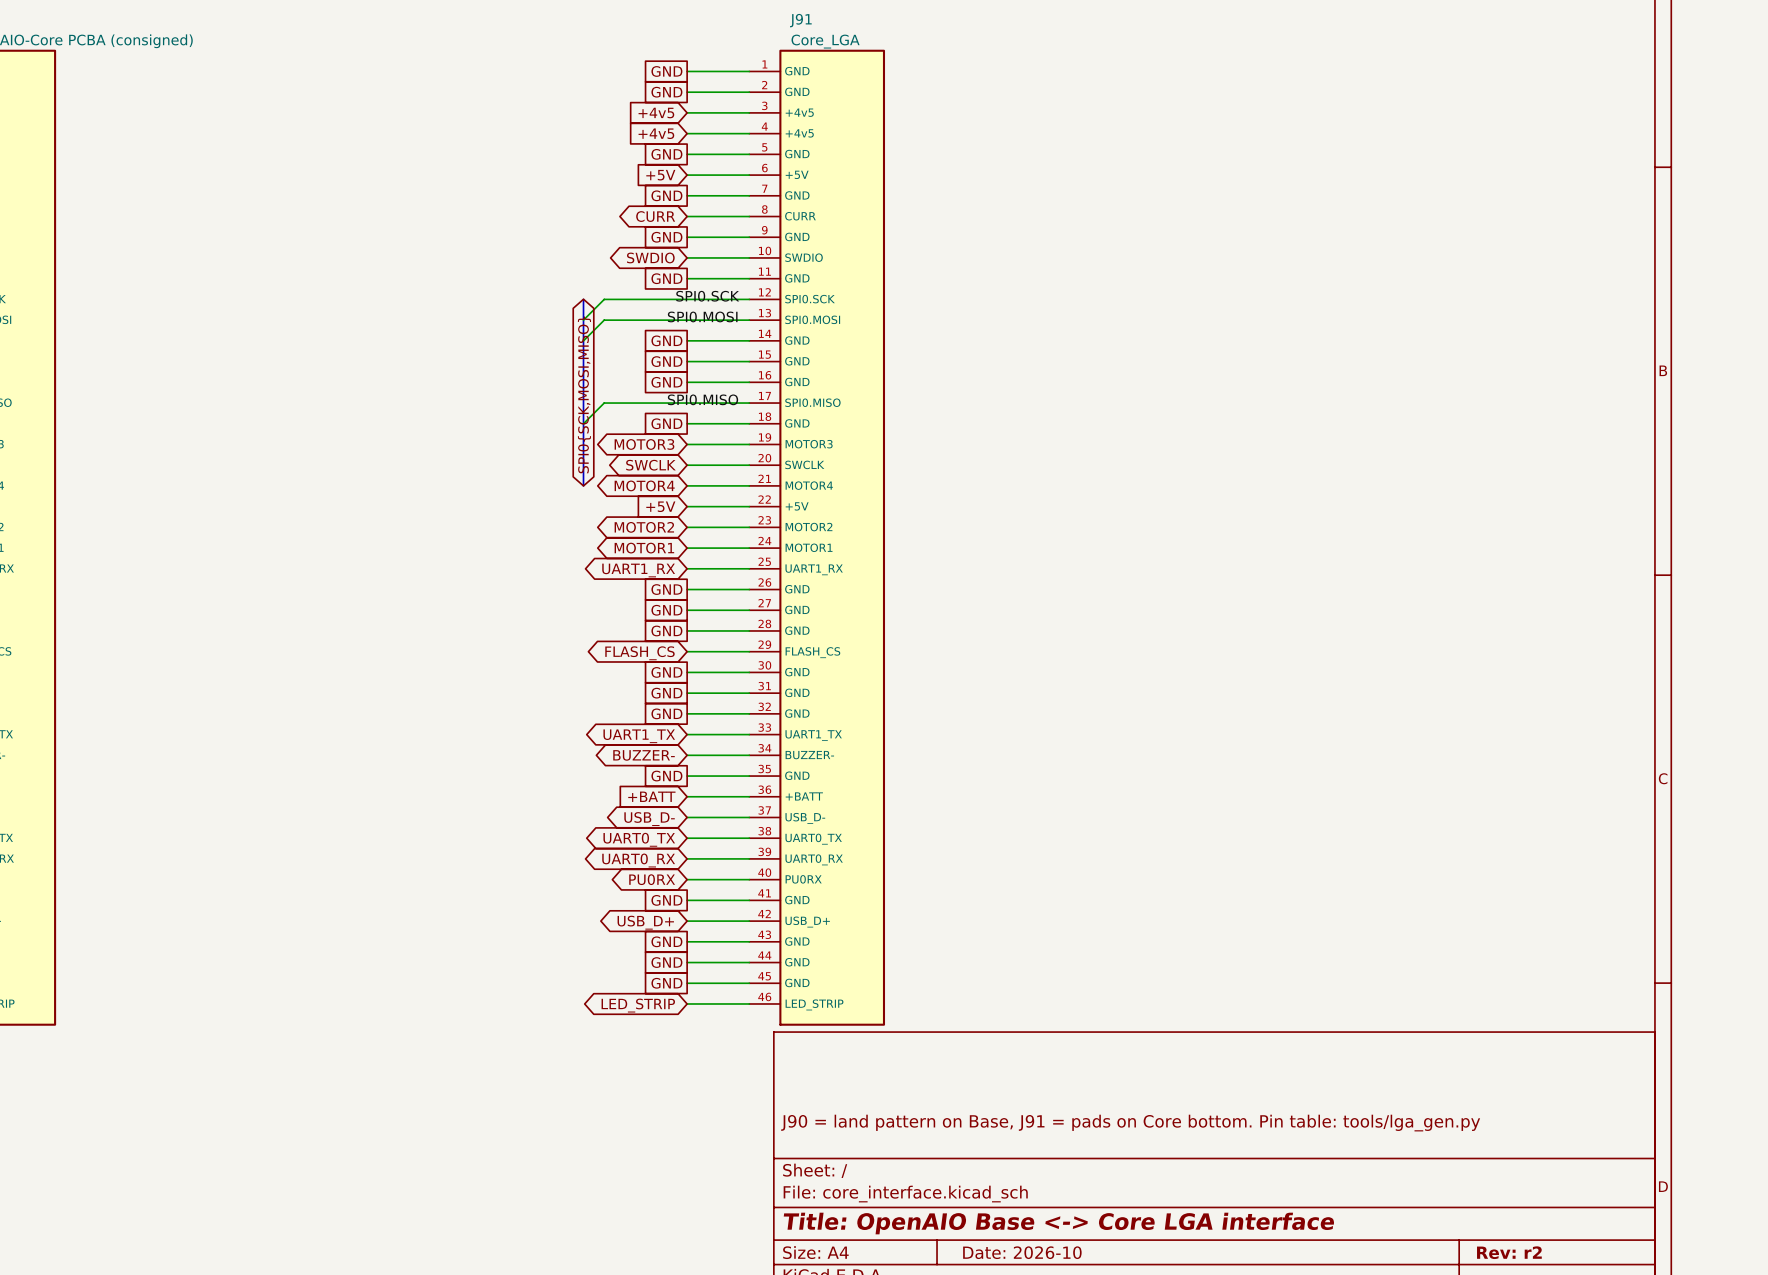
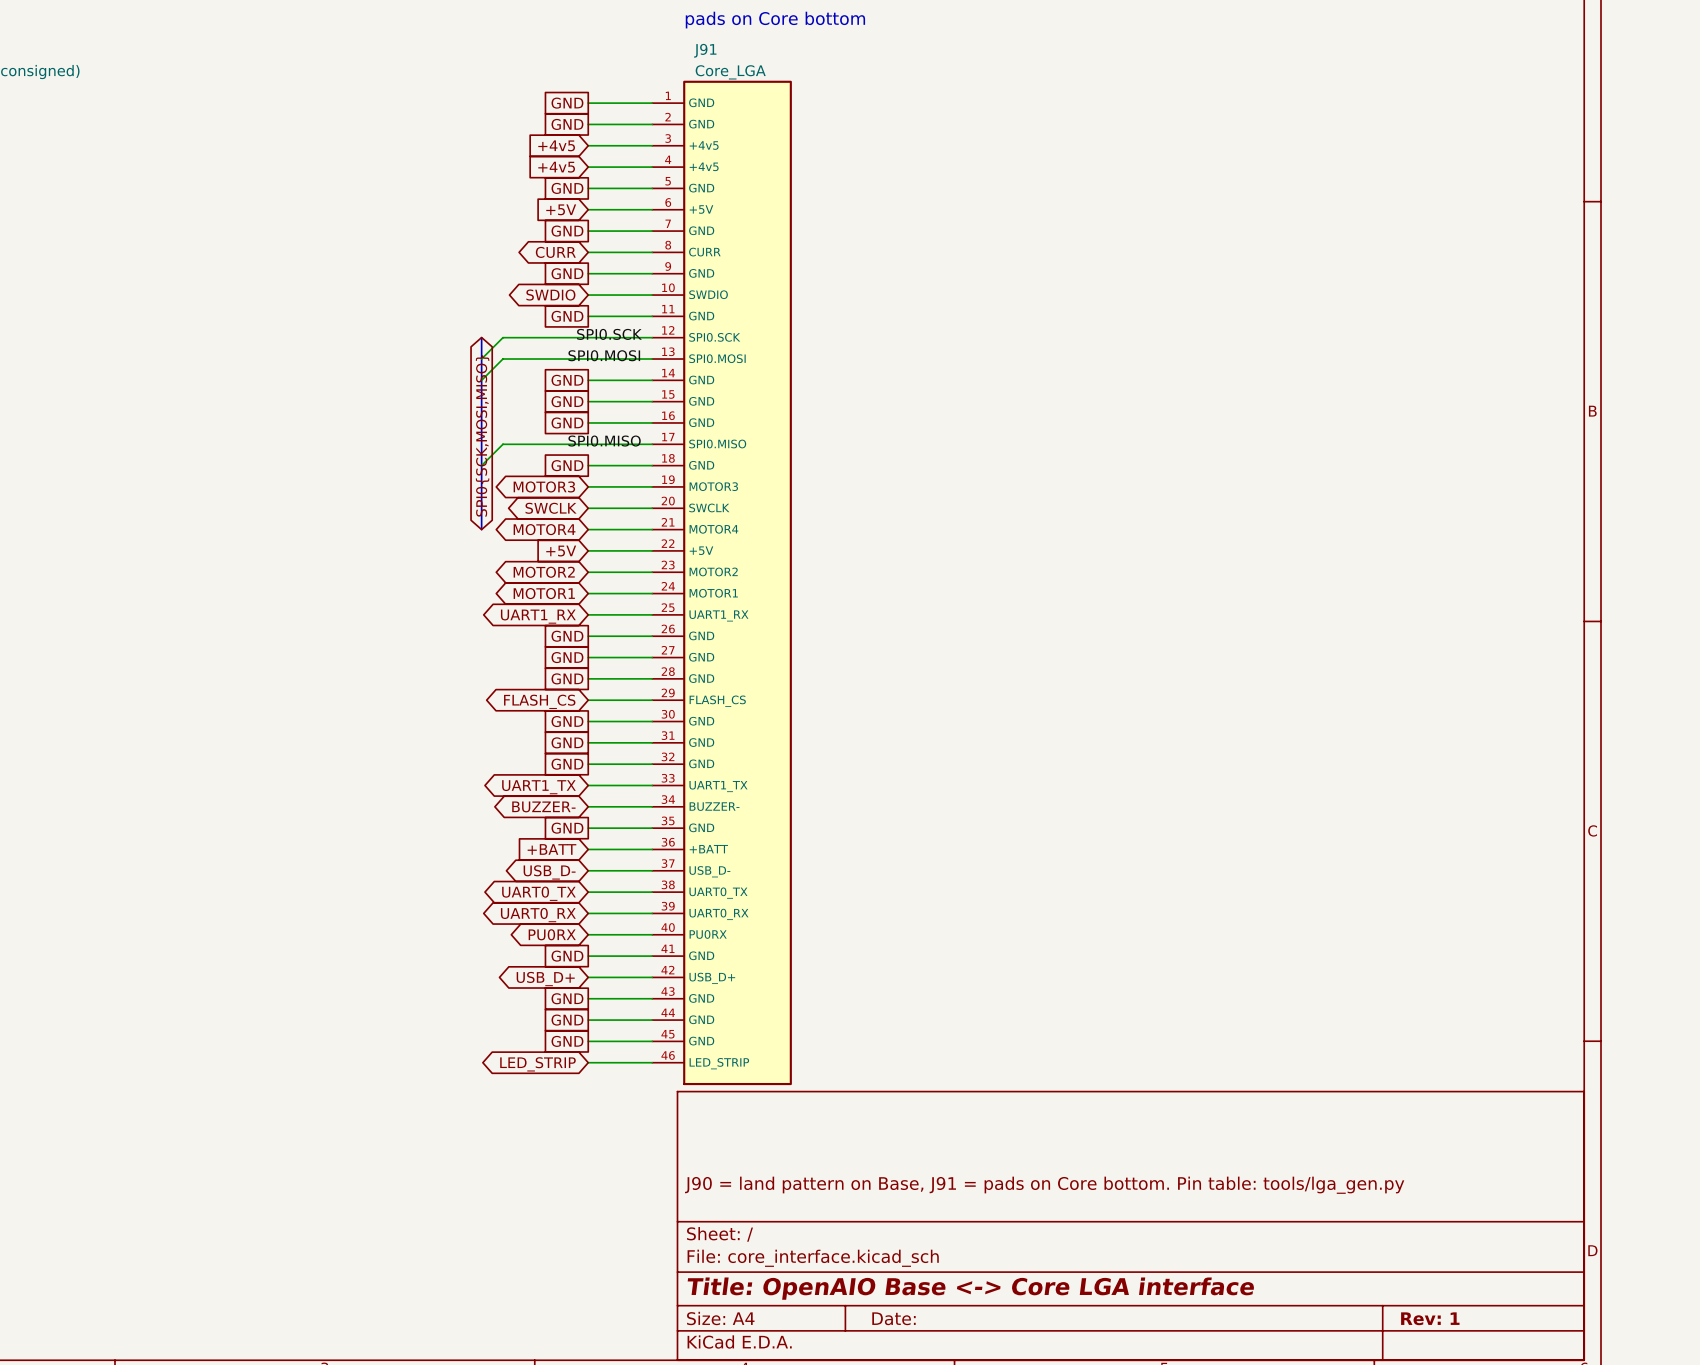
title block: Date: 2026-10 (1022, 1252) -> Date: (893, 1318)
title block: Rev: r2 (1509, 1252) -> Rev: 1 (1430, 1318)

